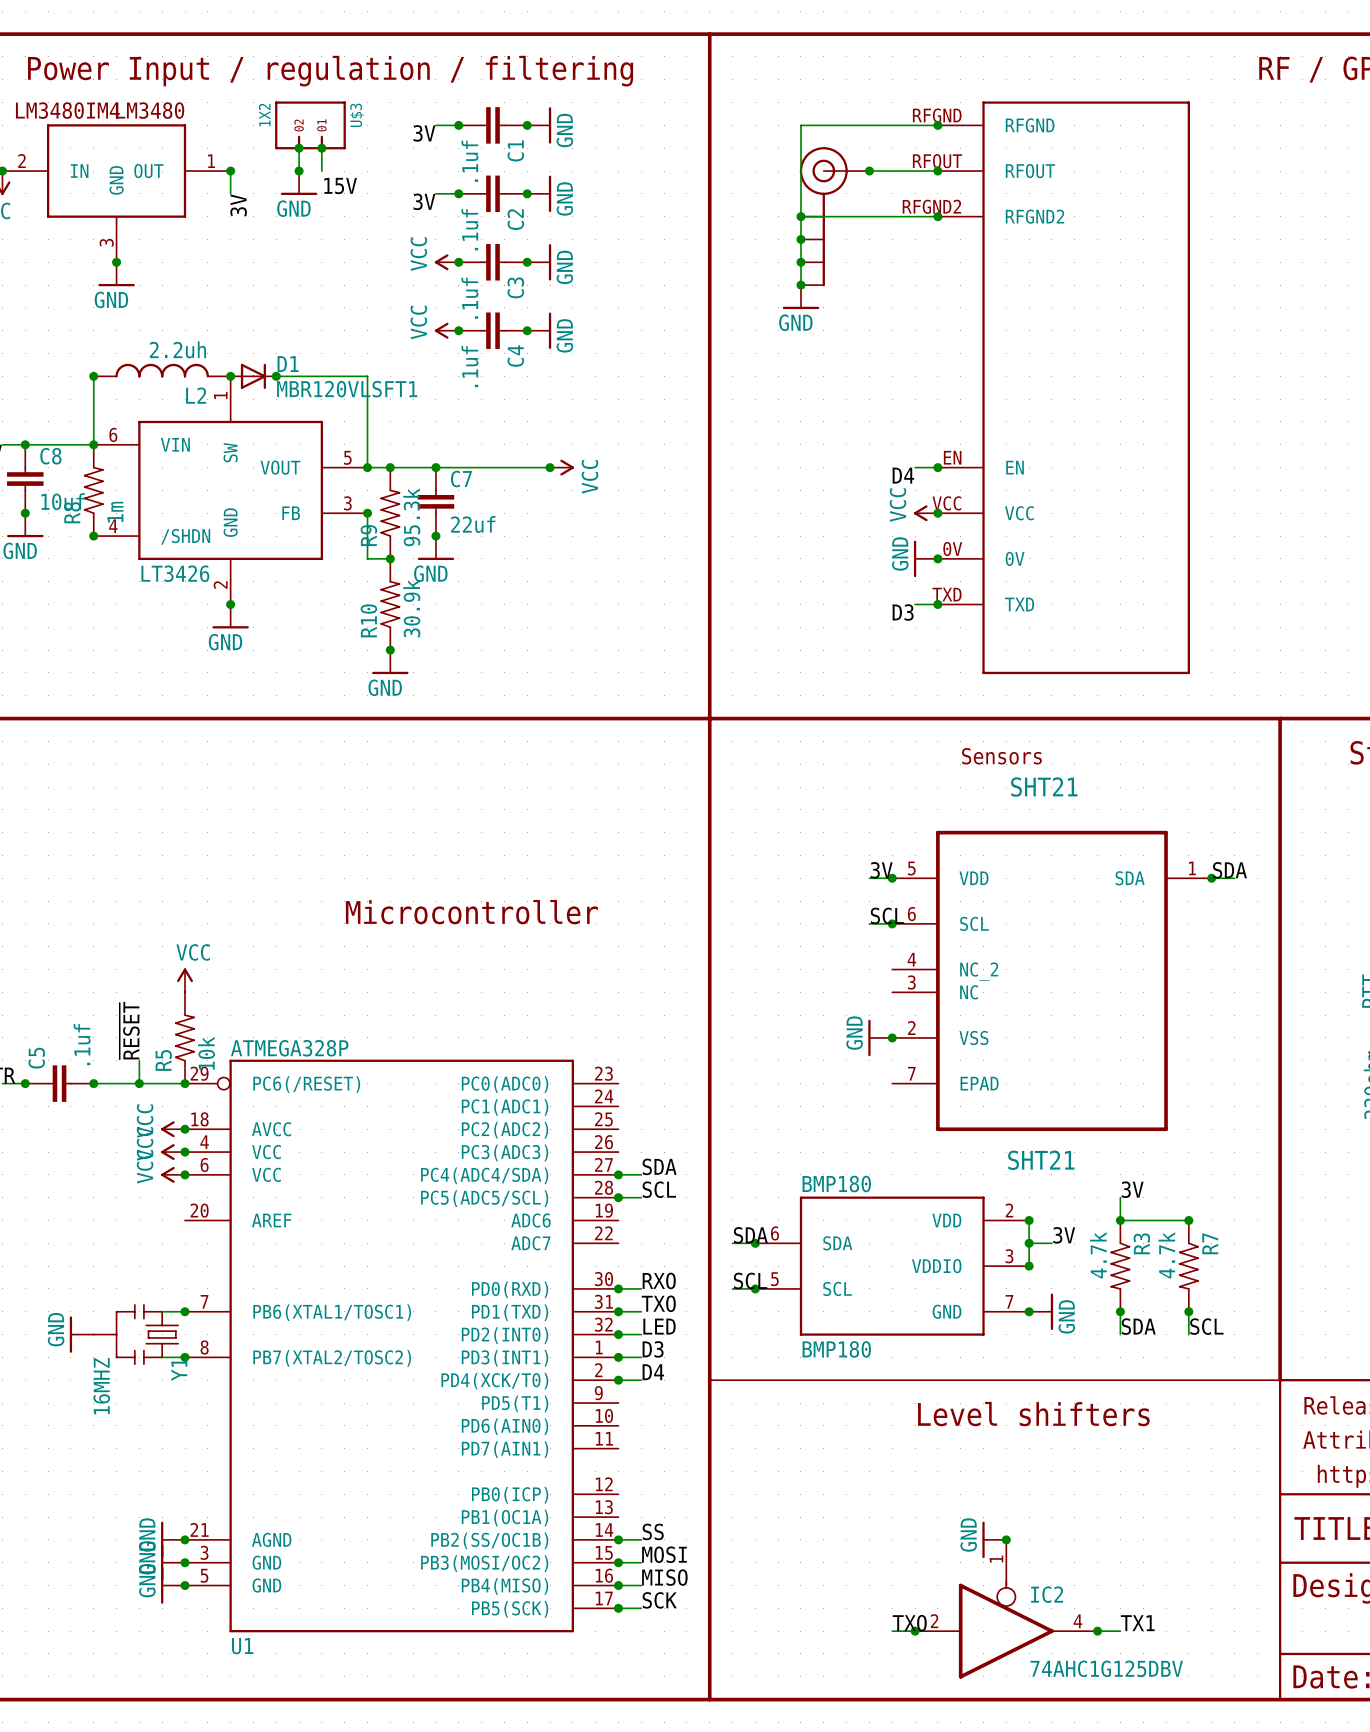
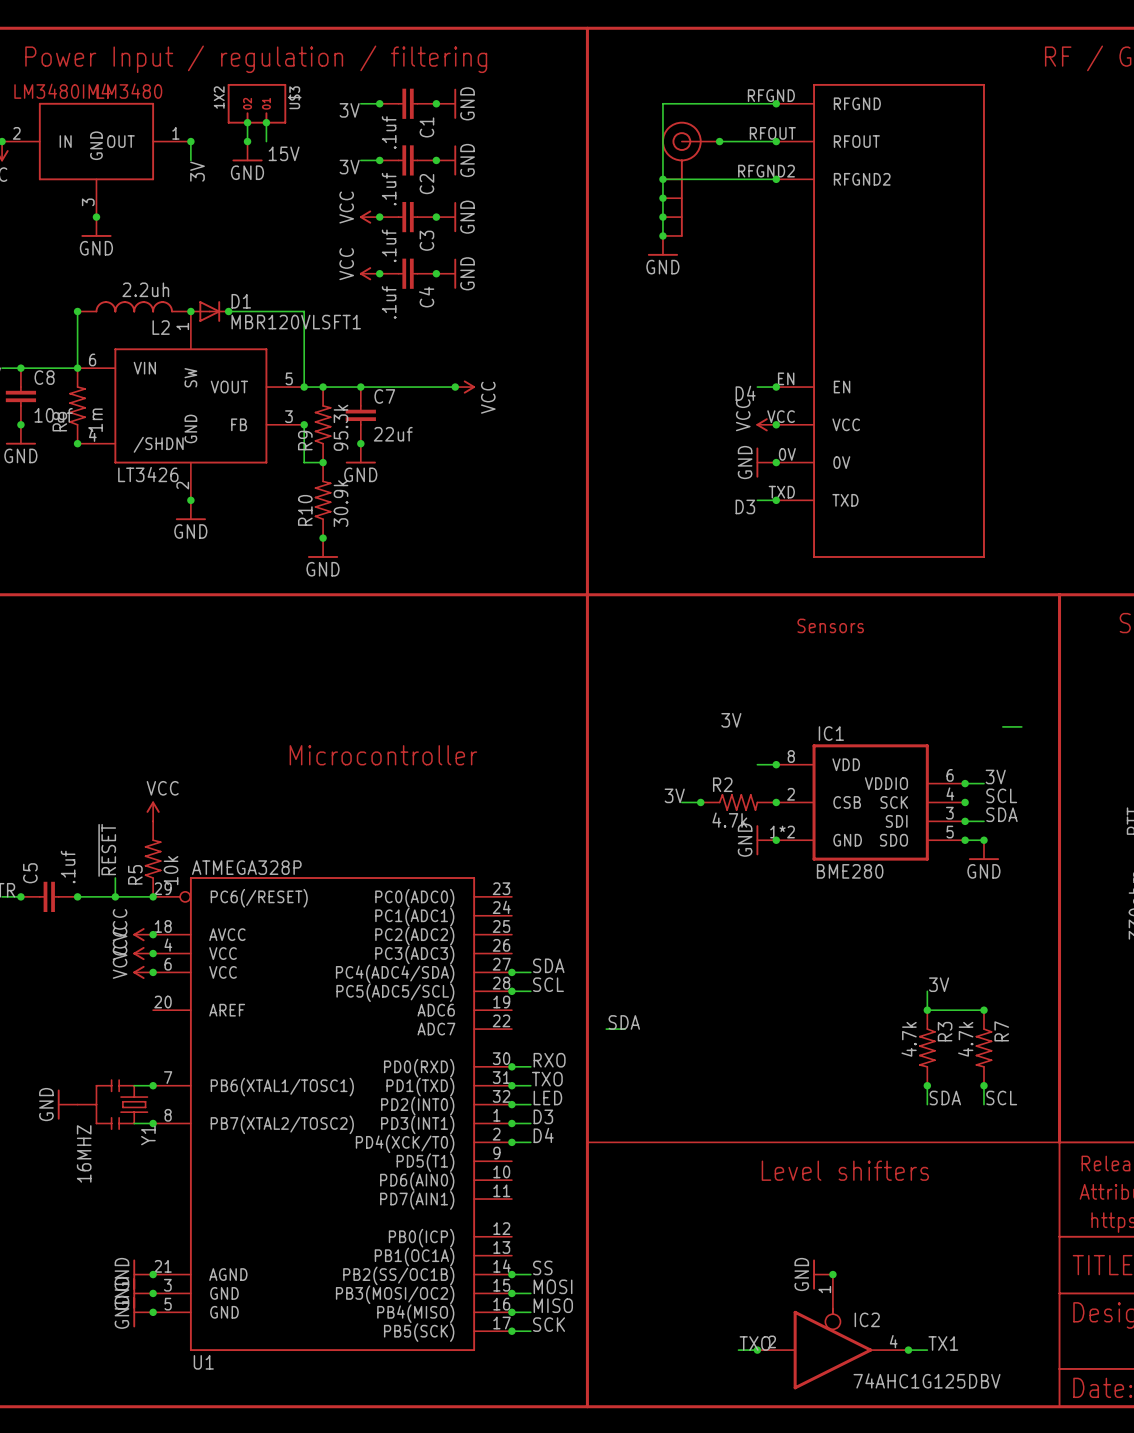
label position: SDA (1229, 870) -> SDA (1001, 814)
wire: (869, 878) (892, 878) -> (681, 802) (700, 802)
junction: (892, 878) -> none
junction: (1211, 878) -> none
label: SCL (887, 915) -> none
junction: (892, 923) -> none
junction: none -> (776, 764)
label: none -> 3V (995, 776)
wire: none -> (965, 783) (983, 783)
junction: none -> (965, 783)
label: none -> 3V (674, 795)
label: none -> SCL (1001, 795)
junction: none -> (700, 802)
R2: none -> 4.7k (738, 802)
junction: none -> (776, 802)
IC1: none -> BME280 (870, 802)
junction: none -> (965, 802)
SHT21: SHT21 (1051, 980) -> none
wire: none -> (965, 821) (983, 821)
junction: none -> (965, 821)
junction: none -> (776, 840)
wire: none -> (965, 840) (983, 840)
junction: none -> (965, 840)
junction: none -> (983, 840)
power symbol: none -> GND (983, 850)
power symbol position: GND (880, 1037) -> GND (766, 840)
junction: (892, 1037) -> none
wire: (1029, 1220) (1029, 1266) -> none
junction: (1029, 1220) -> none
label: 3V (1064, 1235) -> none
junction: (755, 1243) -> none
wire: (1029, 1243) (1051, 1243) -> none
junction: (1029, 1243) -> none
BMP180: BMP180 (892, 1266) -> none
junction: (1029, 1266) -> none
label: SCL (750, 1280) -> none
wire: (732, 1288) (755, 1288) -> none
junction: (755, 1288) -> none
junction: (1029, 1311) -> none
power symbol: GND (1041, 1311) -> none

